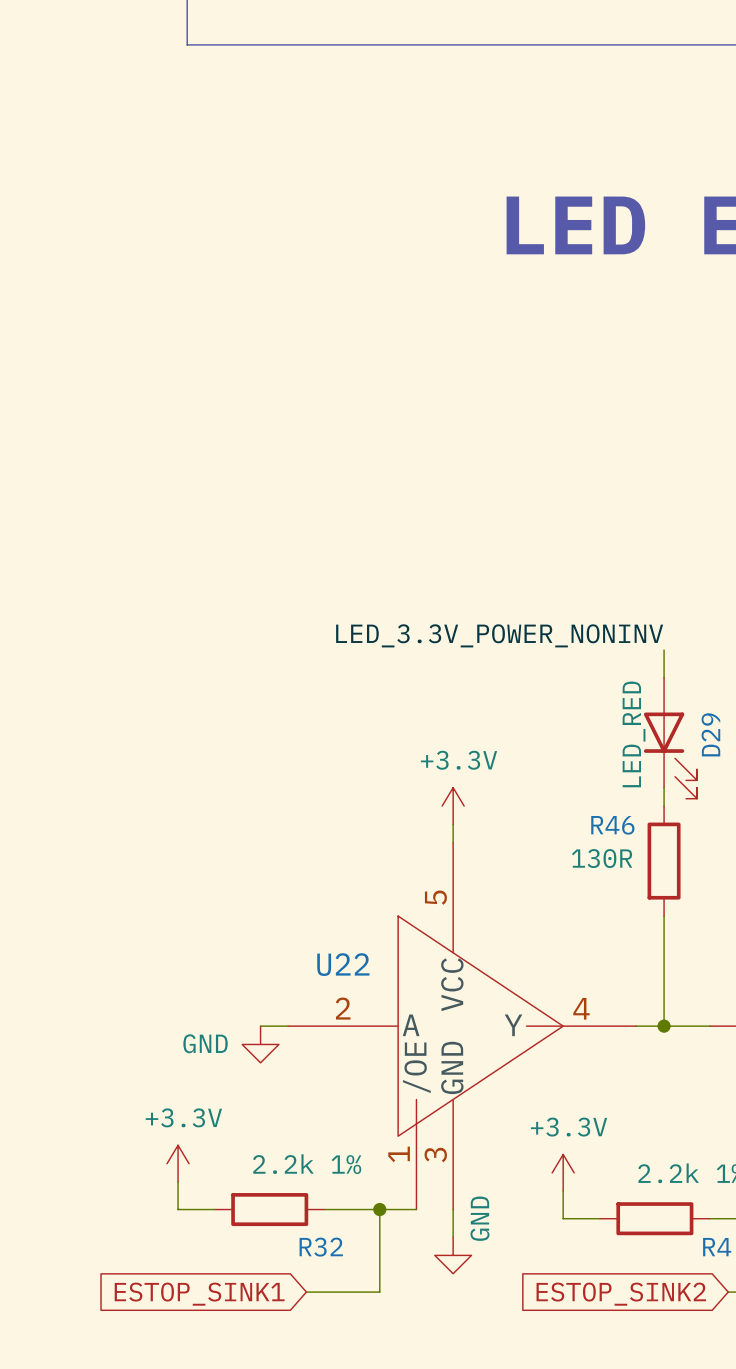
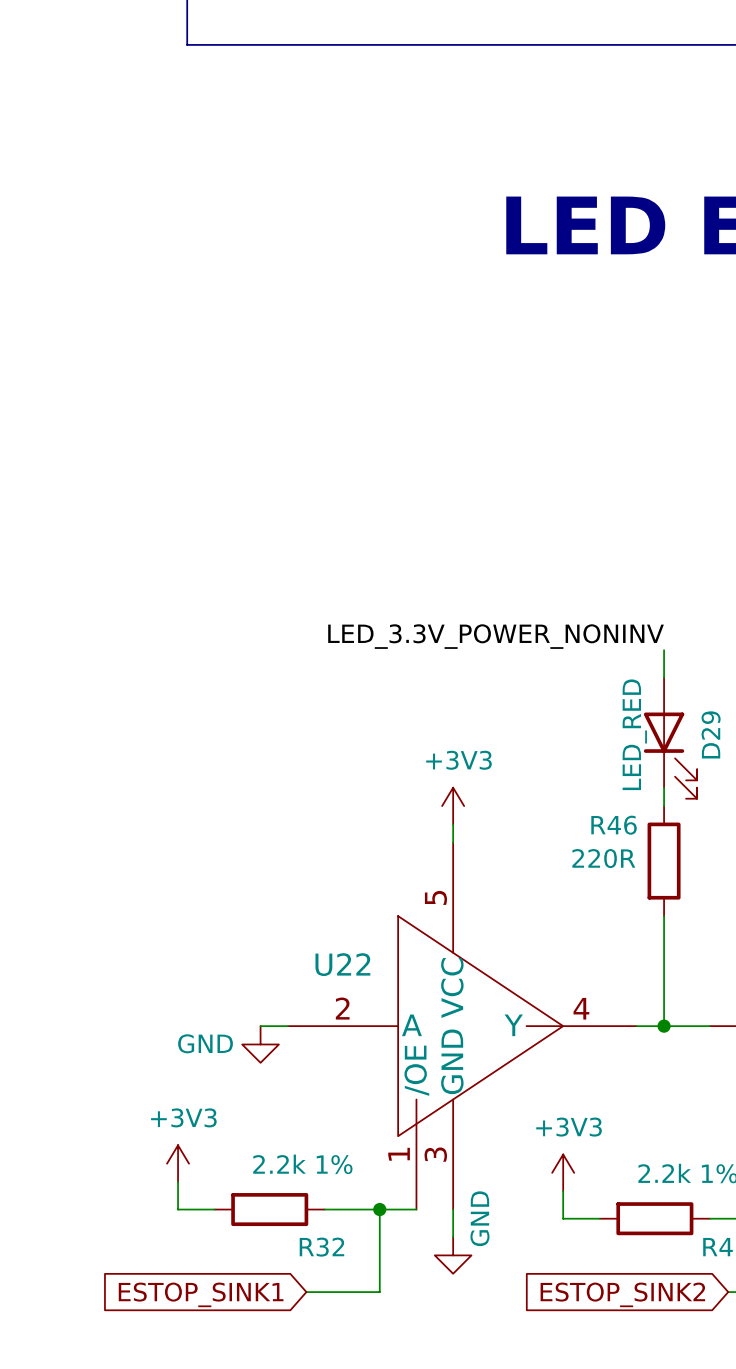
power symbol: +3.3V (453, 806) -> +3V3 (453, 806)
R46 value: 130R (602, 858) -> 220R (603, 858)
power symbol: +3.3V (178, 1163) -> +3V3 (178, 1163)
power symbol: +3.3V (563, 1172) -> +3V3 (563, 1172)

